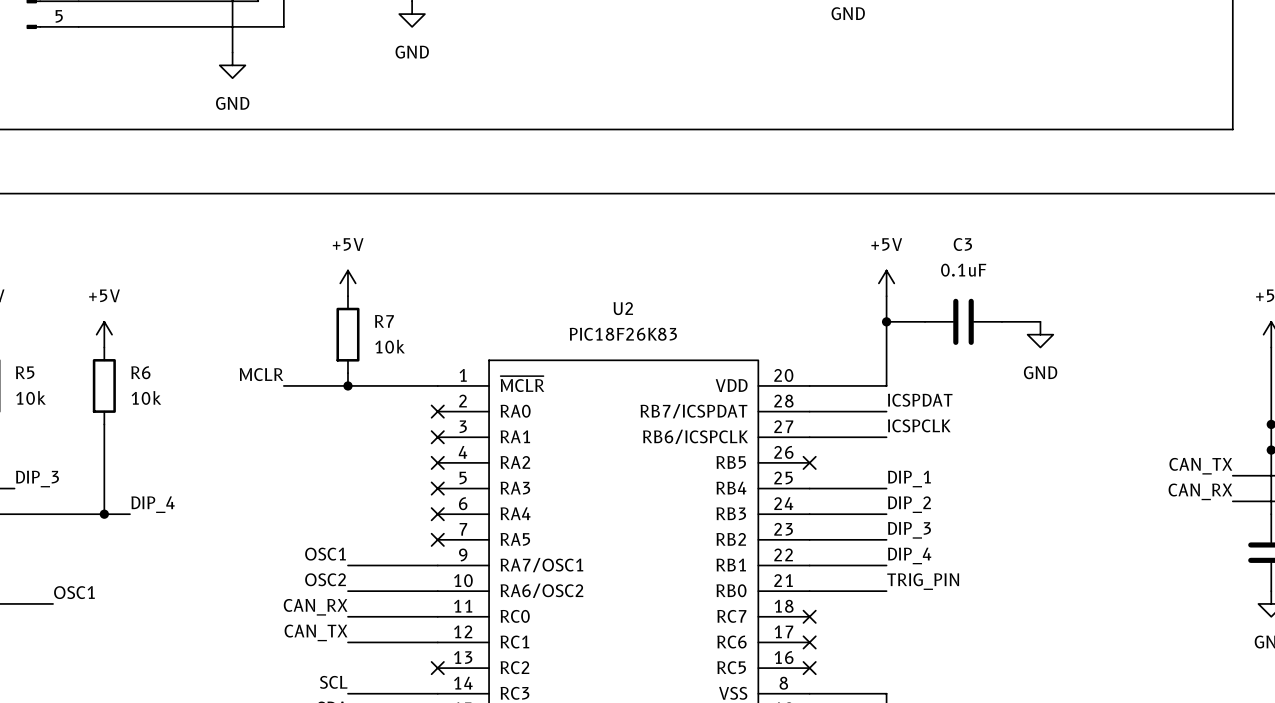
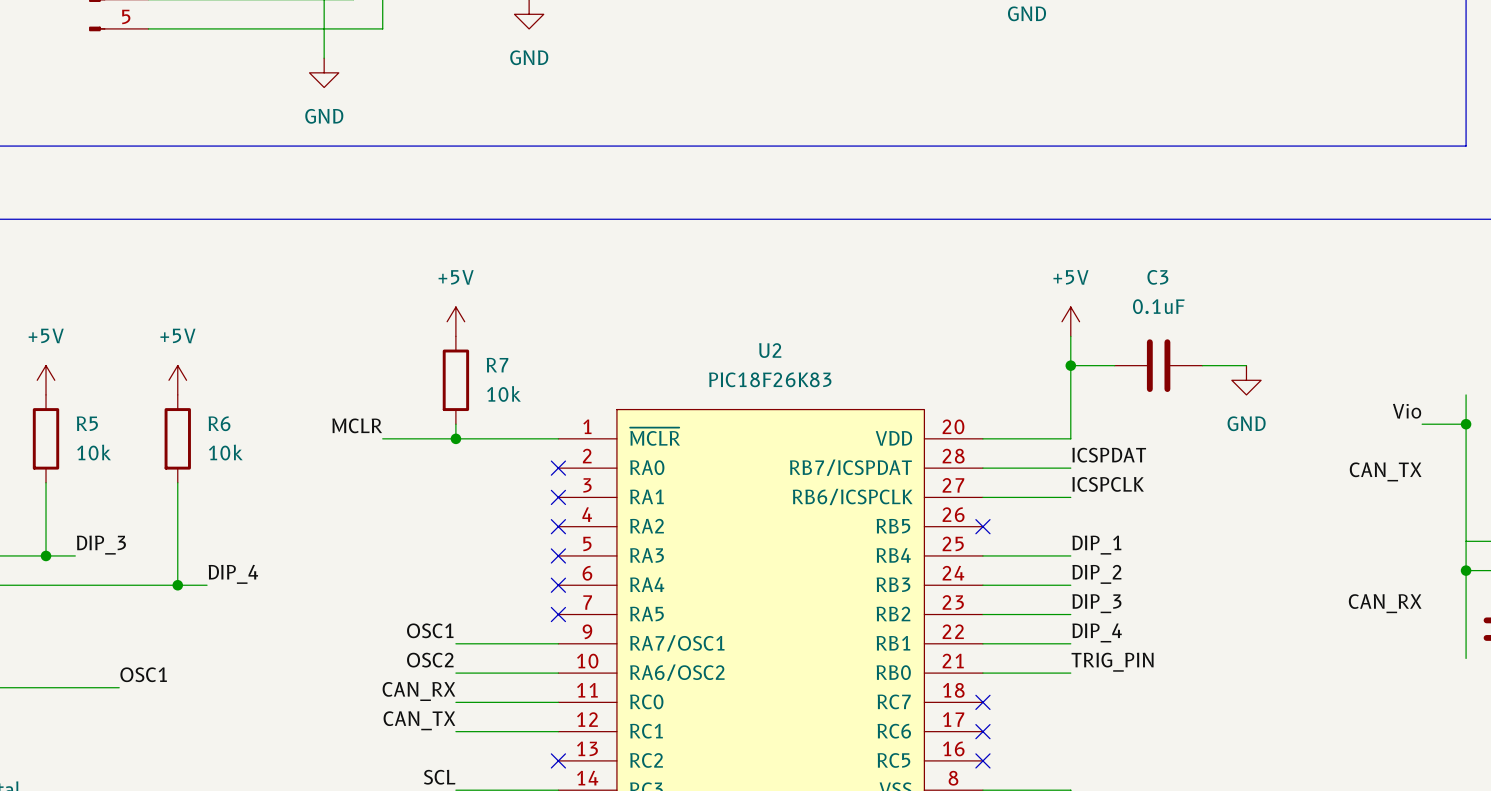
wire: none -> (1466, 394) (1466, 658)
label: none -> Vio (1407, 411)
wire: none -> (1422, 424) (1466, 424)
junction: none -> (1466, 424)
label position: CAN_TX (1200, 466) -> CAN_TX (1385, 471)
label position: CAN_RX (1200, 491) -> CAN_RX (1385, 603)
junction: none -> (1466, 570)

